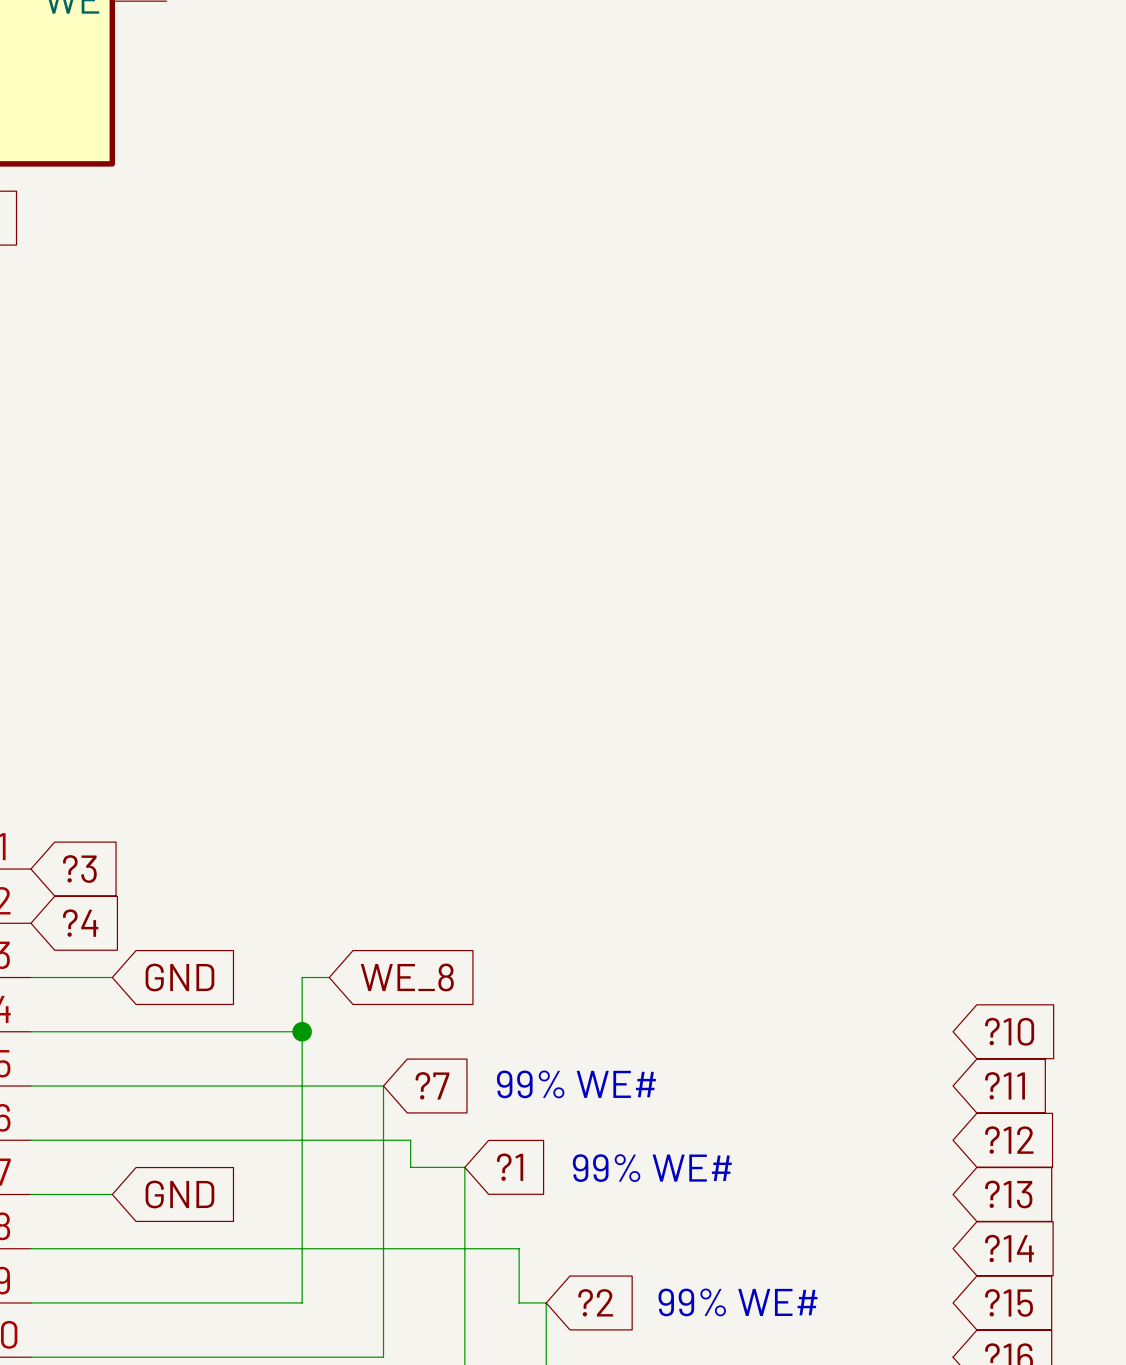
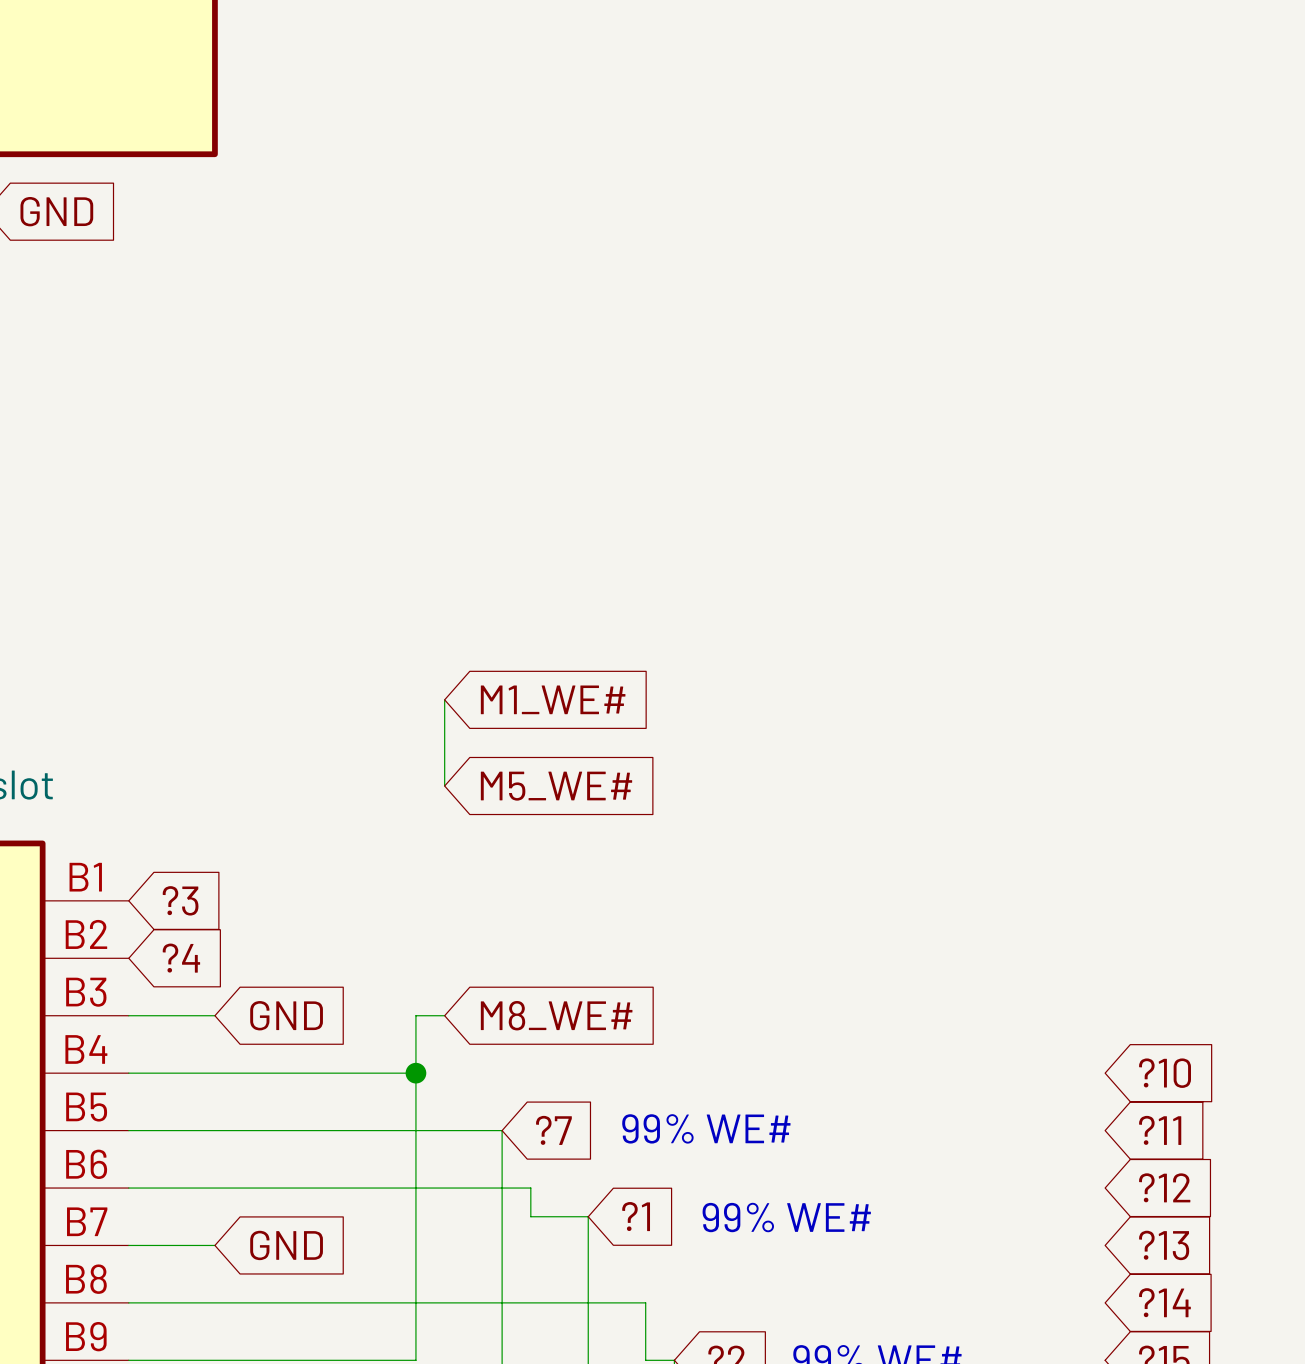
wire: none -> (444, 699) (444, 786)
global label: none -> M1_WE# (553, 699)
global label: none -> M5_WE# (556, 786)
global label: WE_8 (407, 977) -> M8_WE# (556, 1015)

